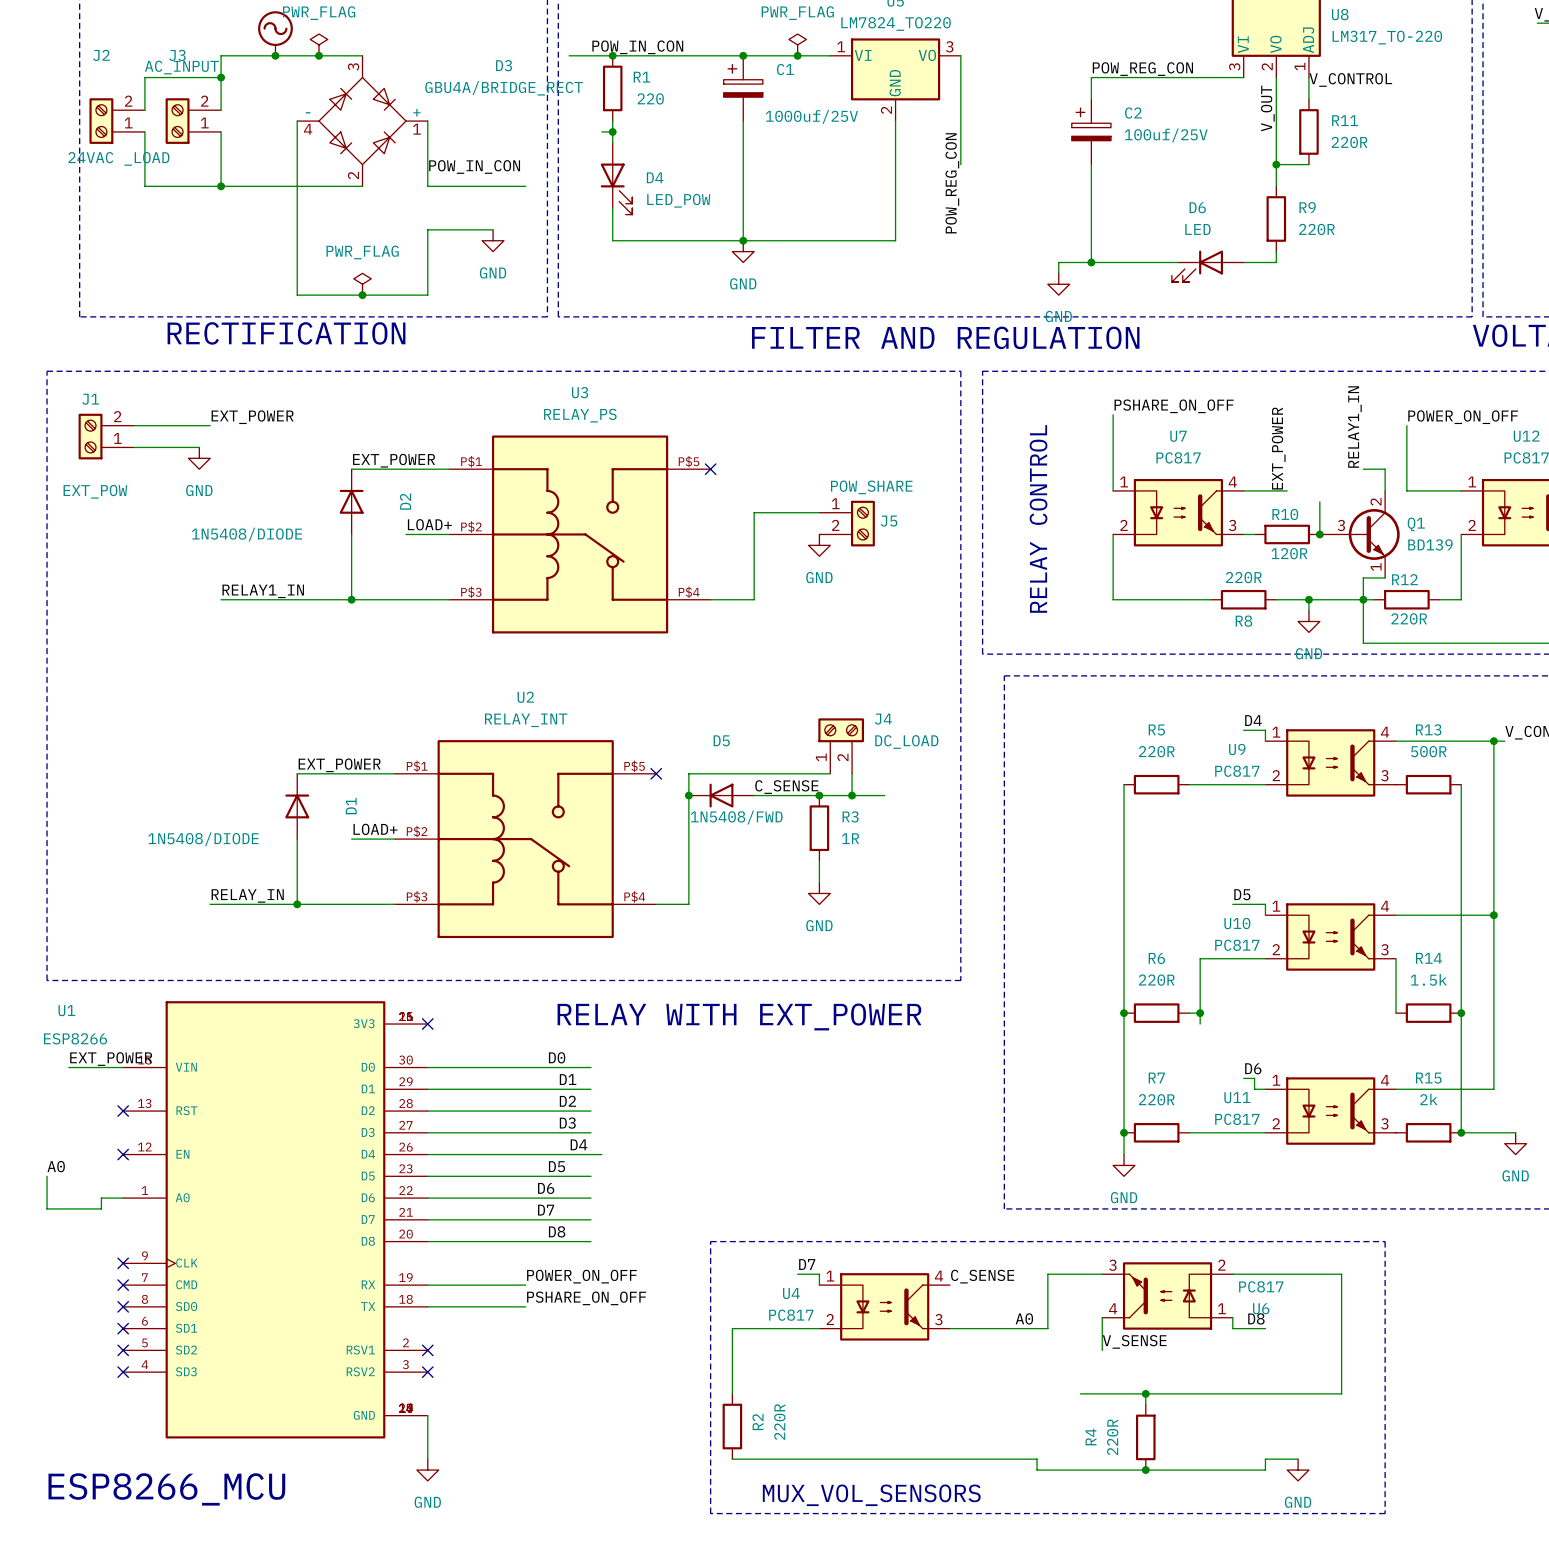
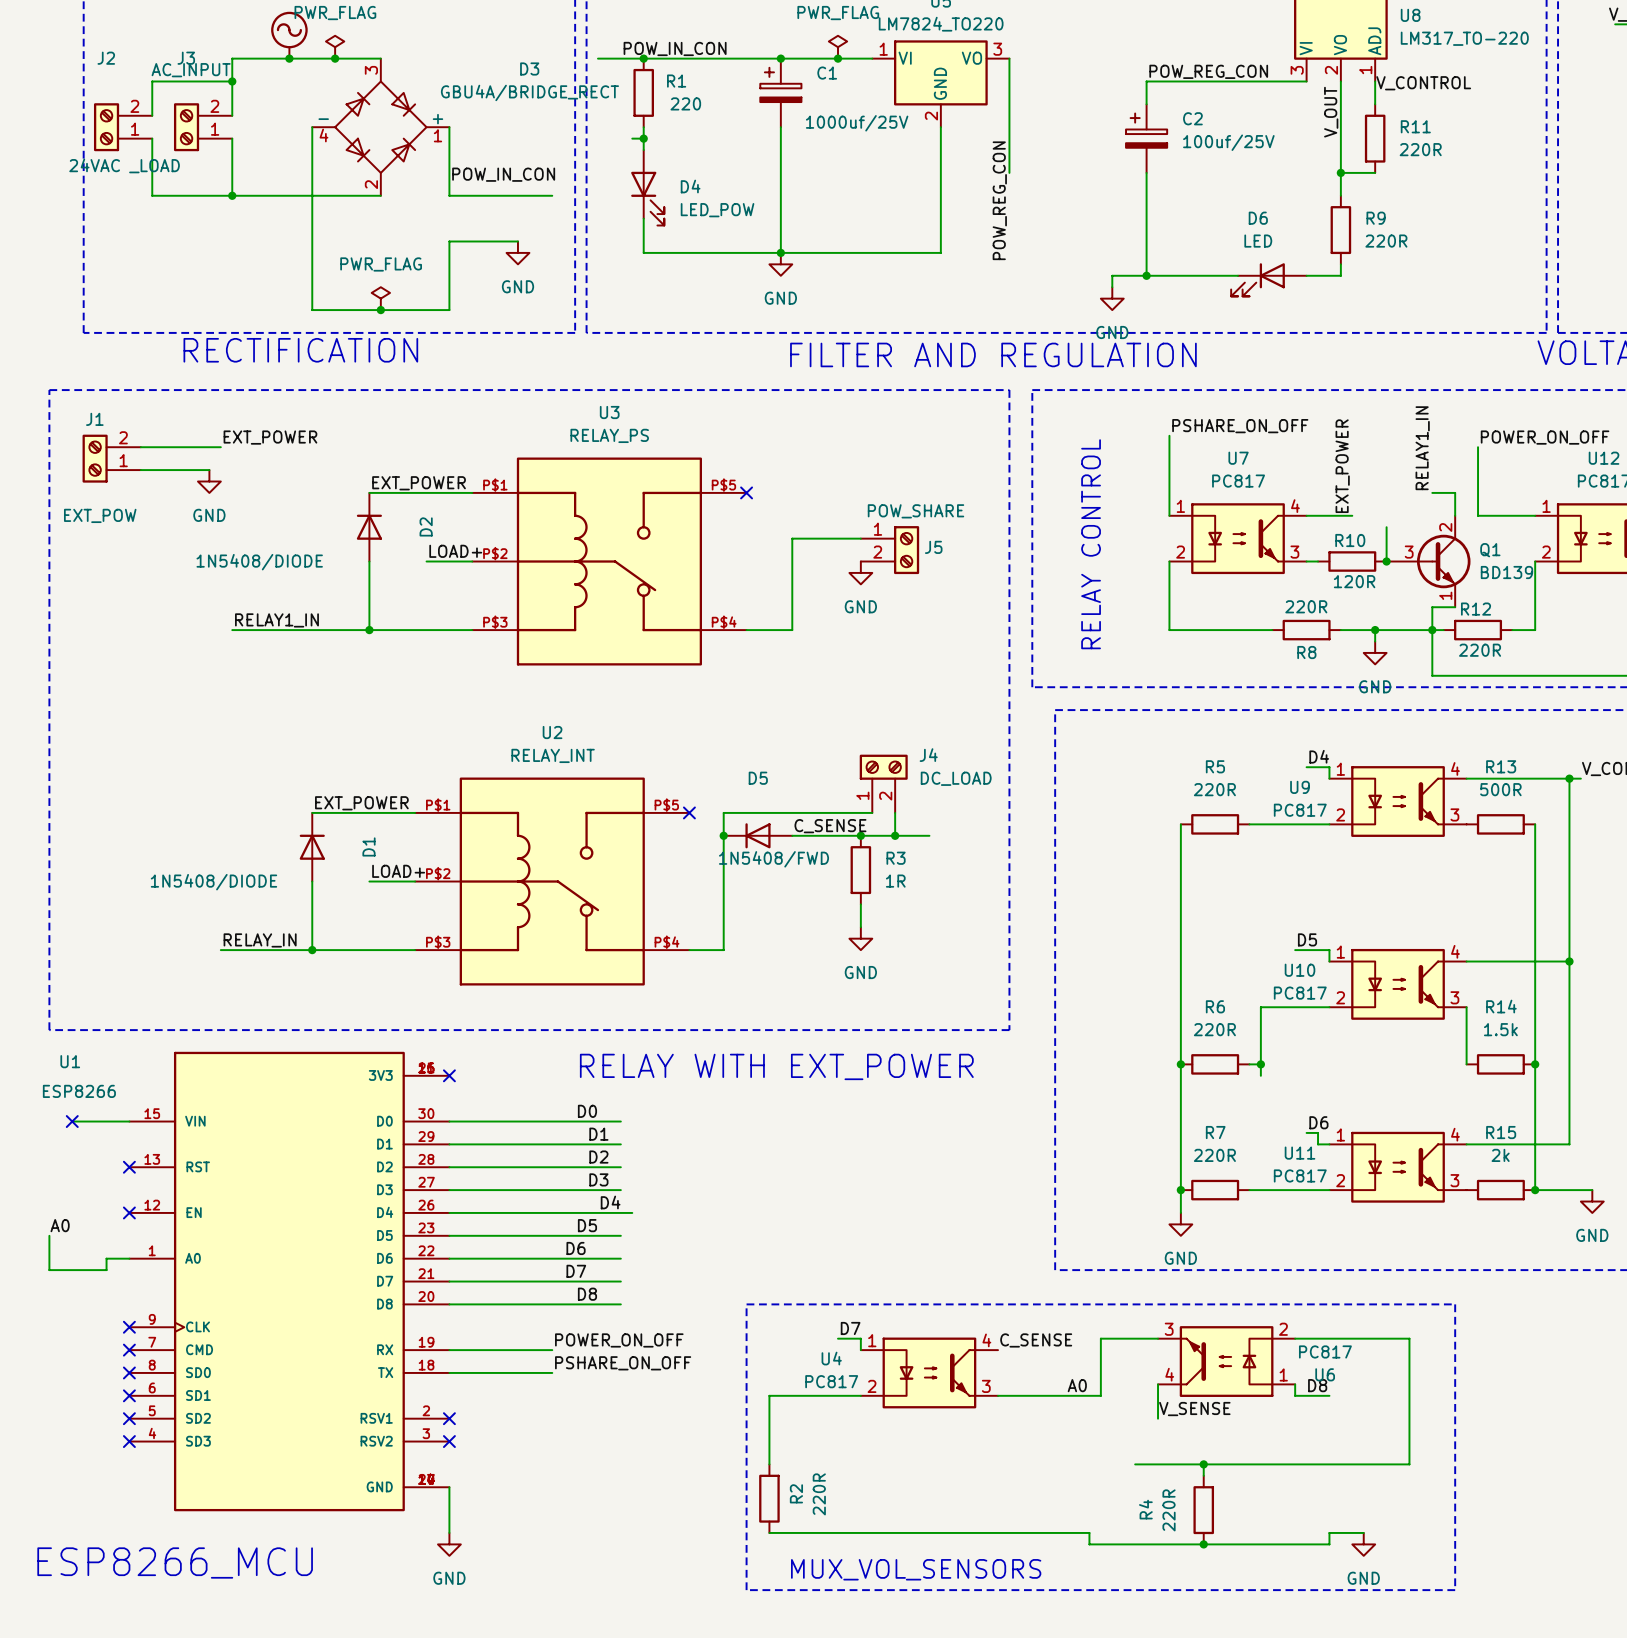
label: EXT_POWER (111, 1059) -> none
no-connect mark: none -> (72, 1121)

